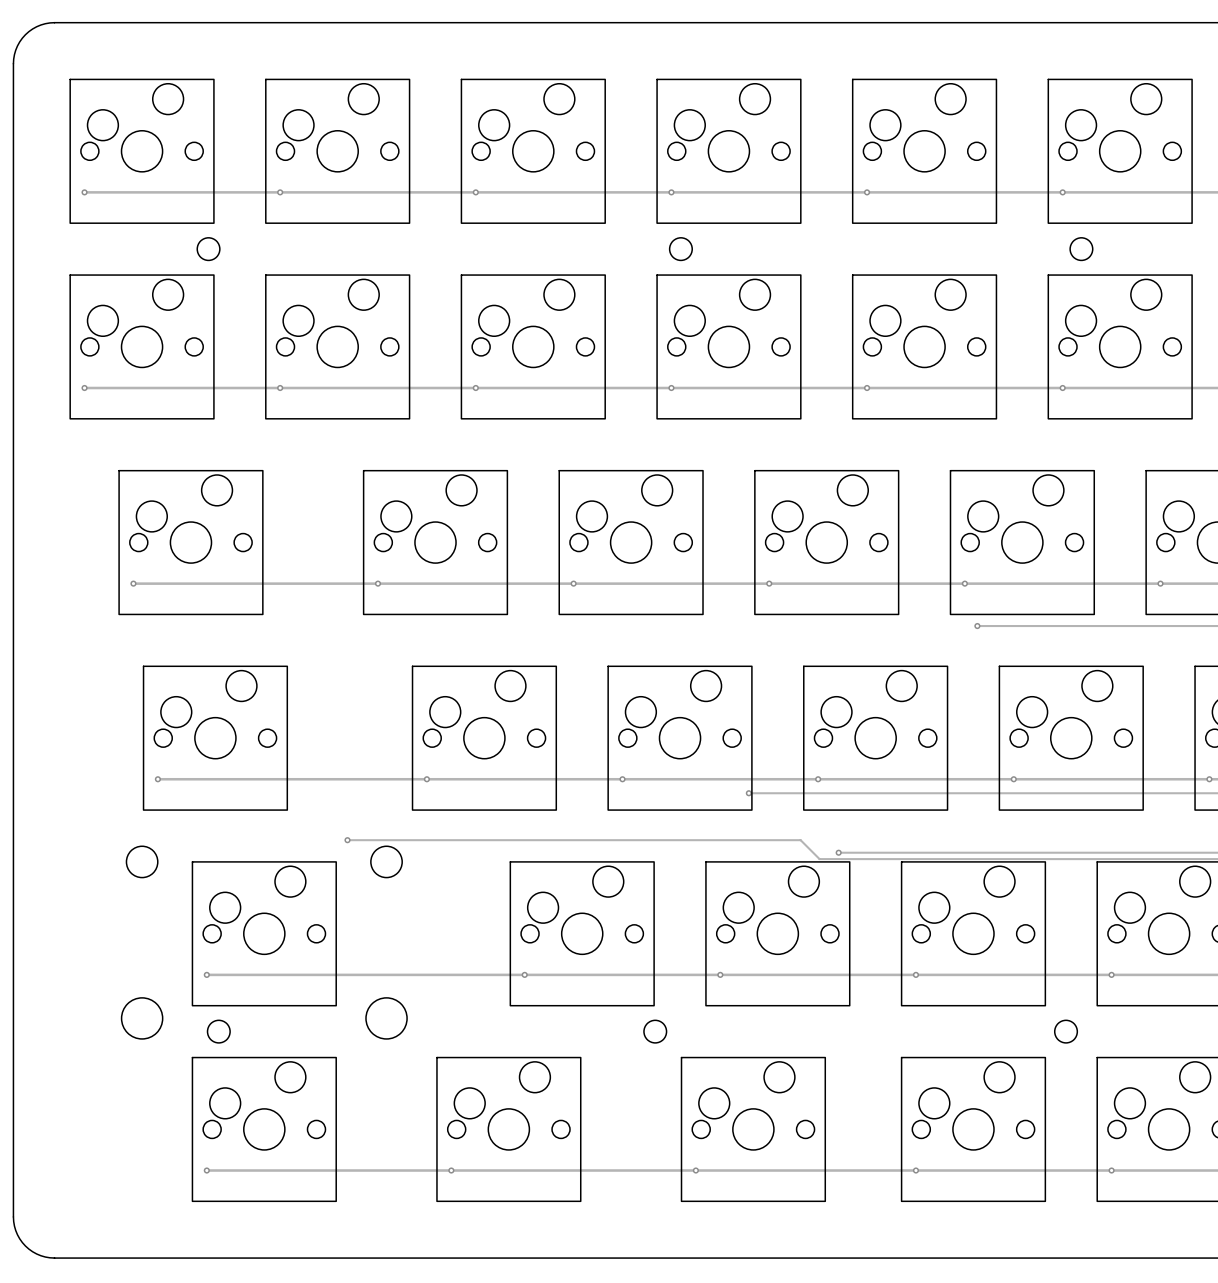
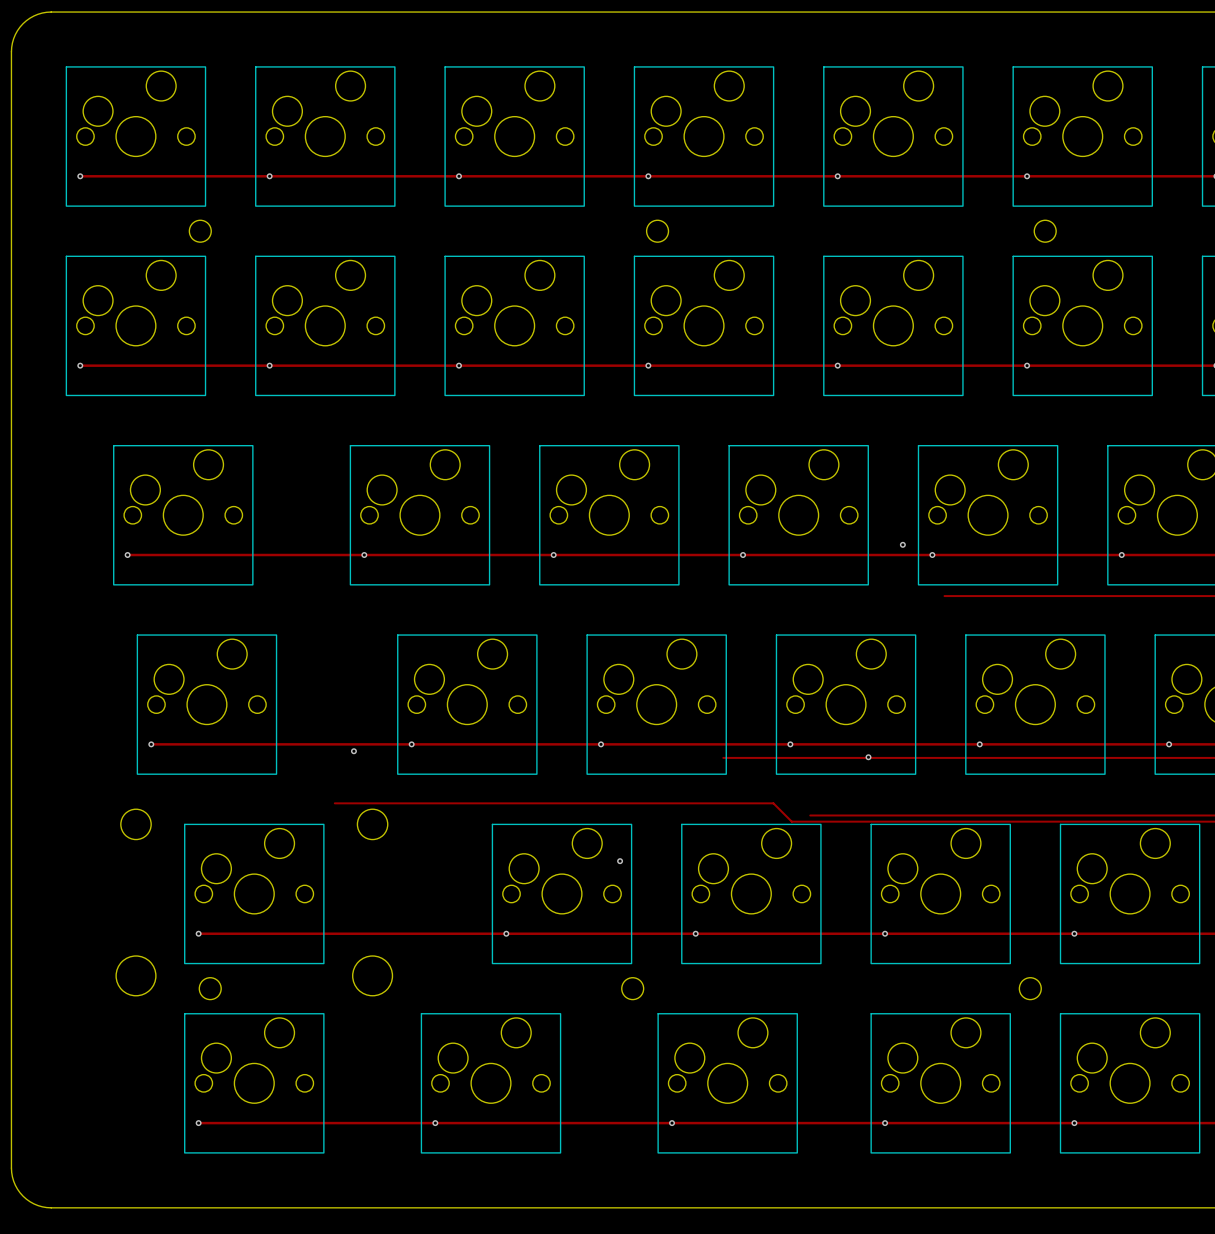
via: none -> (902, 544)
via: (977, 626) -> none
via: none -> (868, 757)
via: (748, 793) -> none
via position: (347, 840) -> (353, 751)
via: (838, 852) -> none
via: none -> (620, 861)

